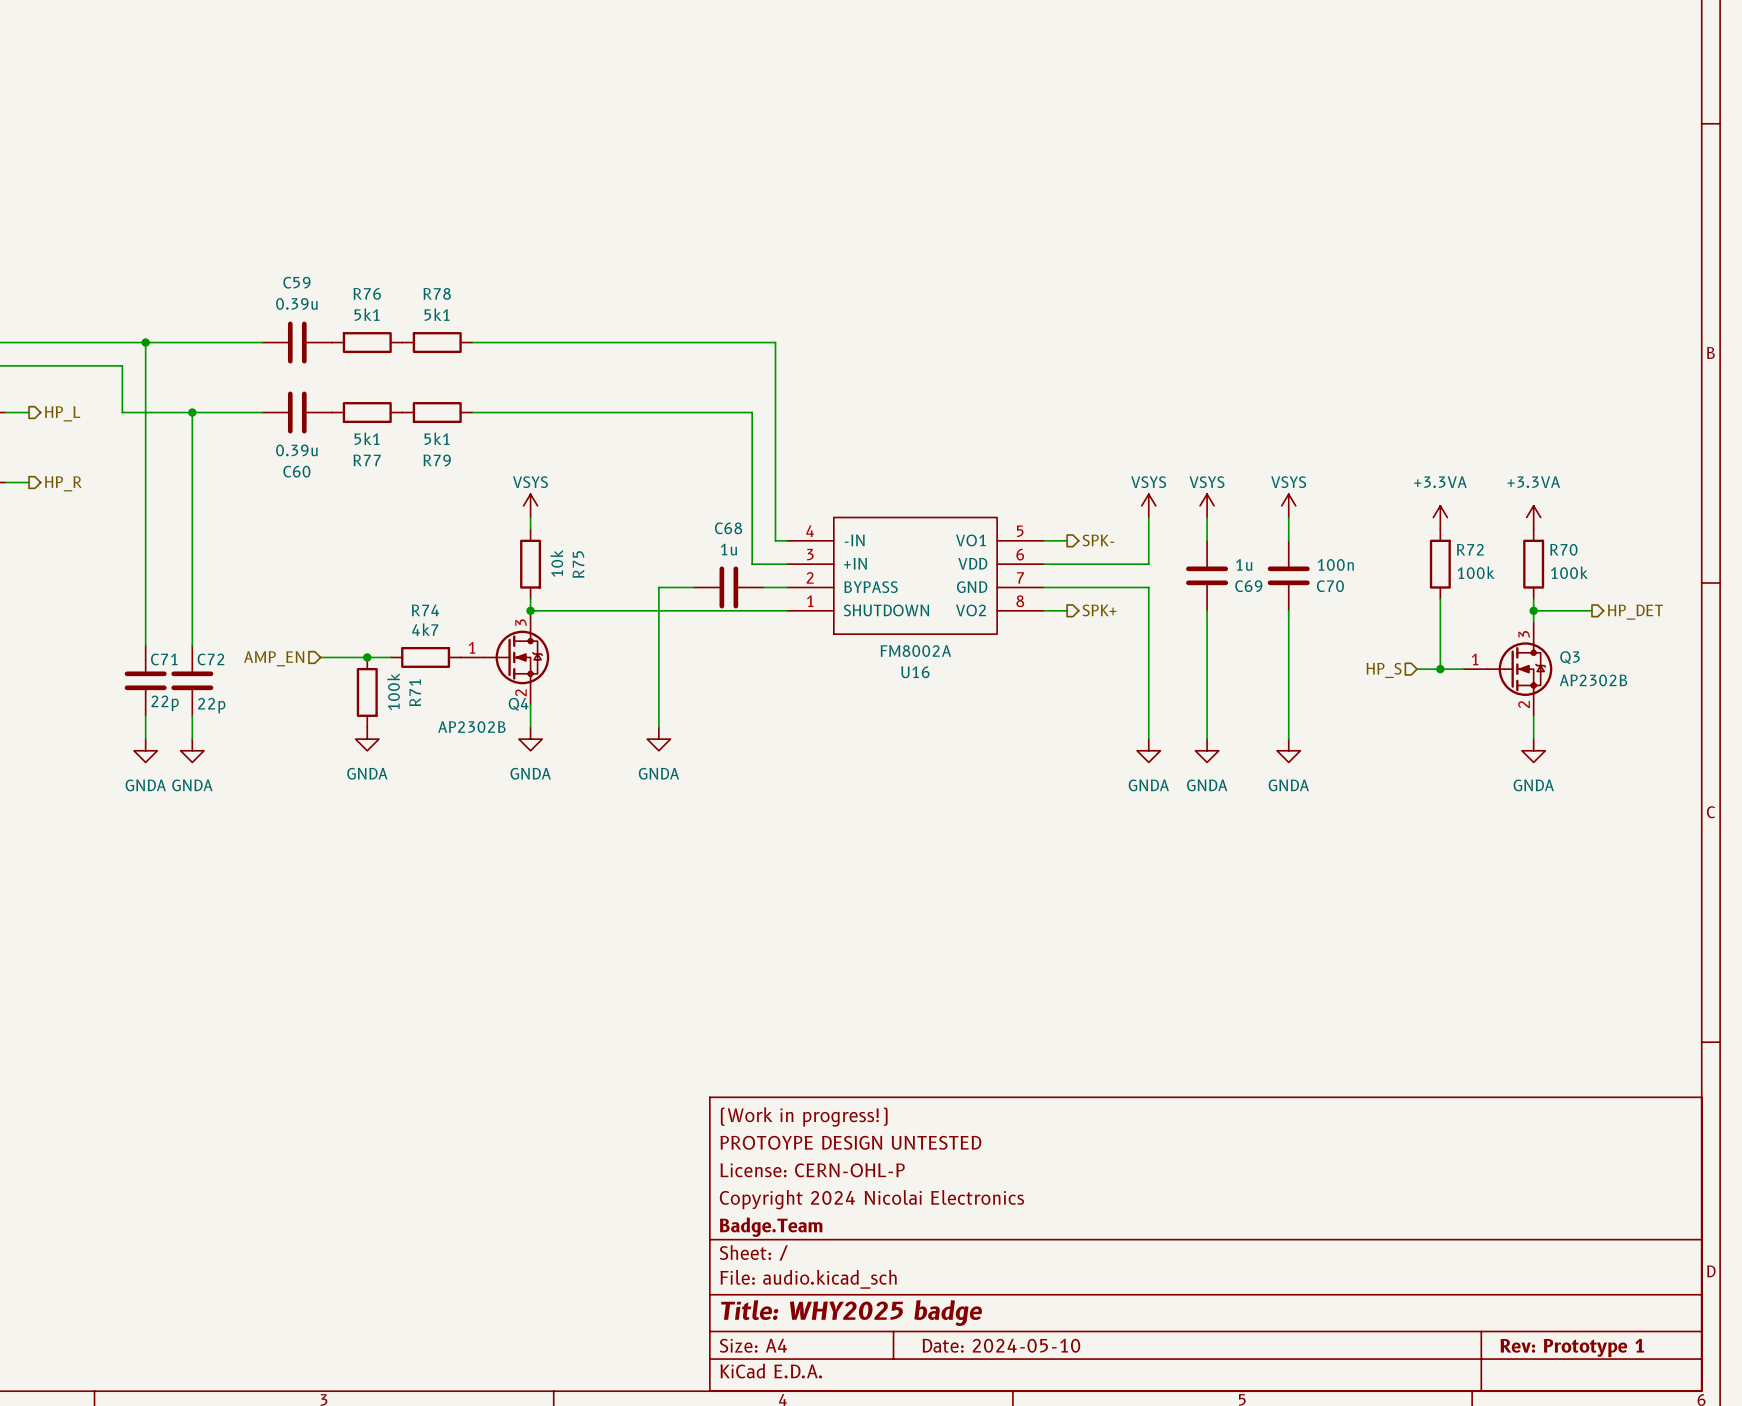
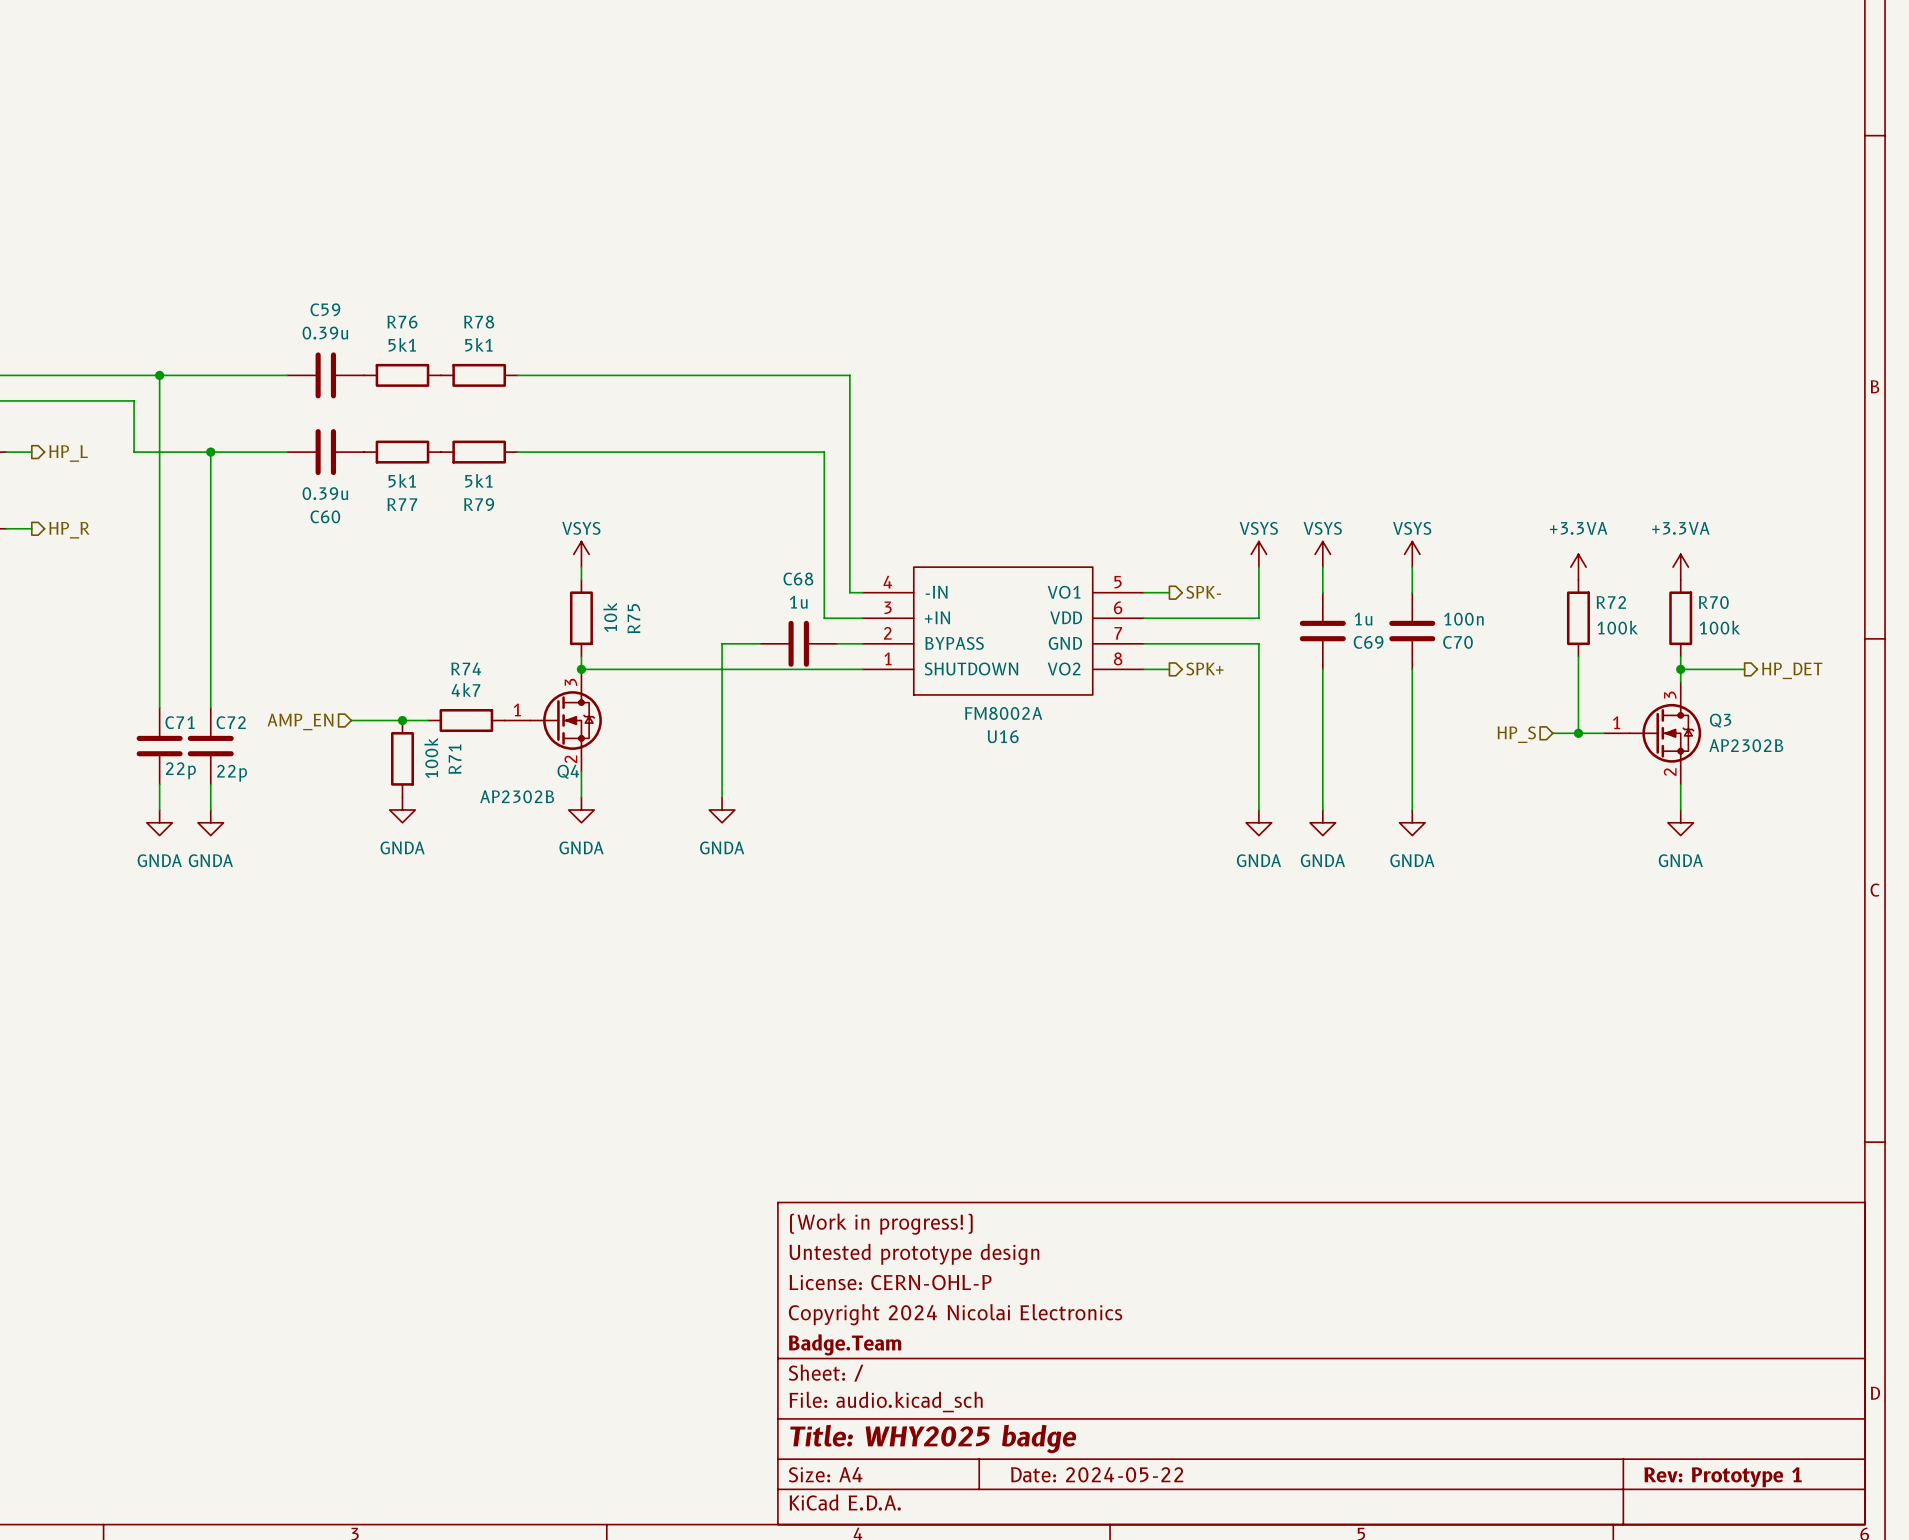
title block: PROTOYPE DESIGN UNTESTED (850, 1142) -> Untested prototype design (914, 1254)
title block: Date: 2024-05-10 (1001, 1345) -> Date: 2024-05-22 (1097, 1474)

